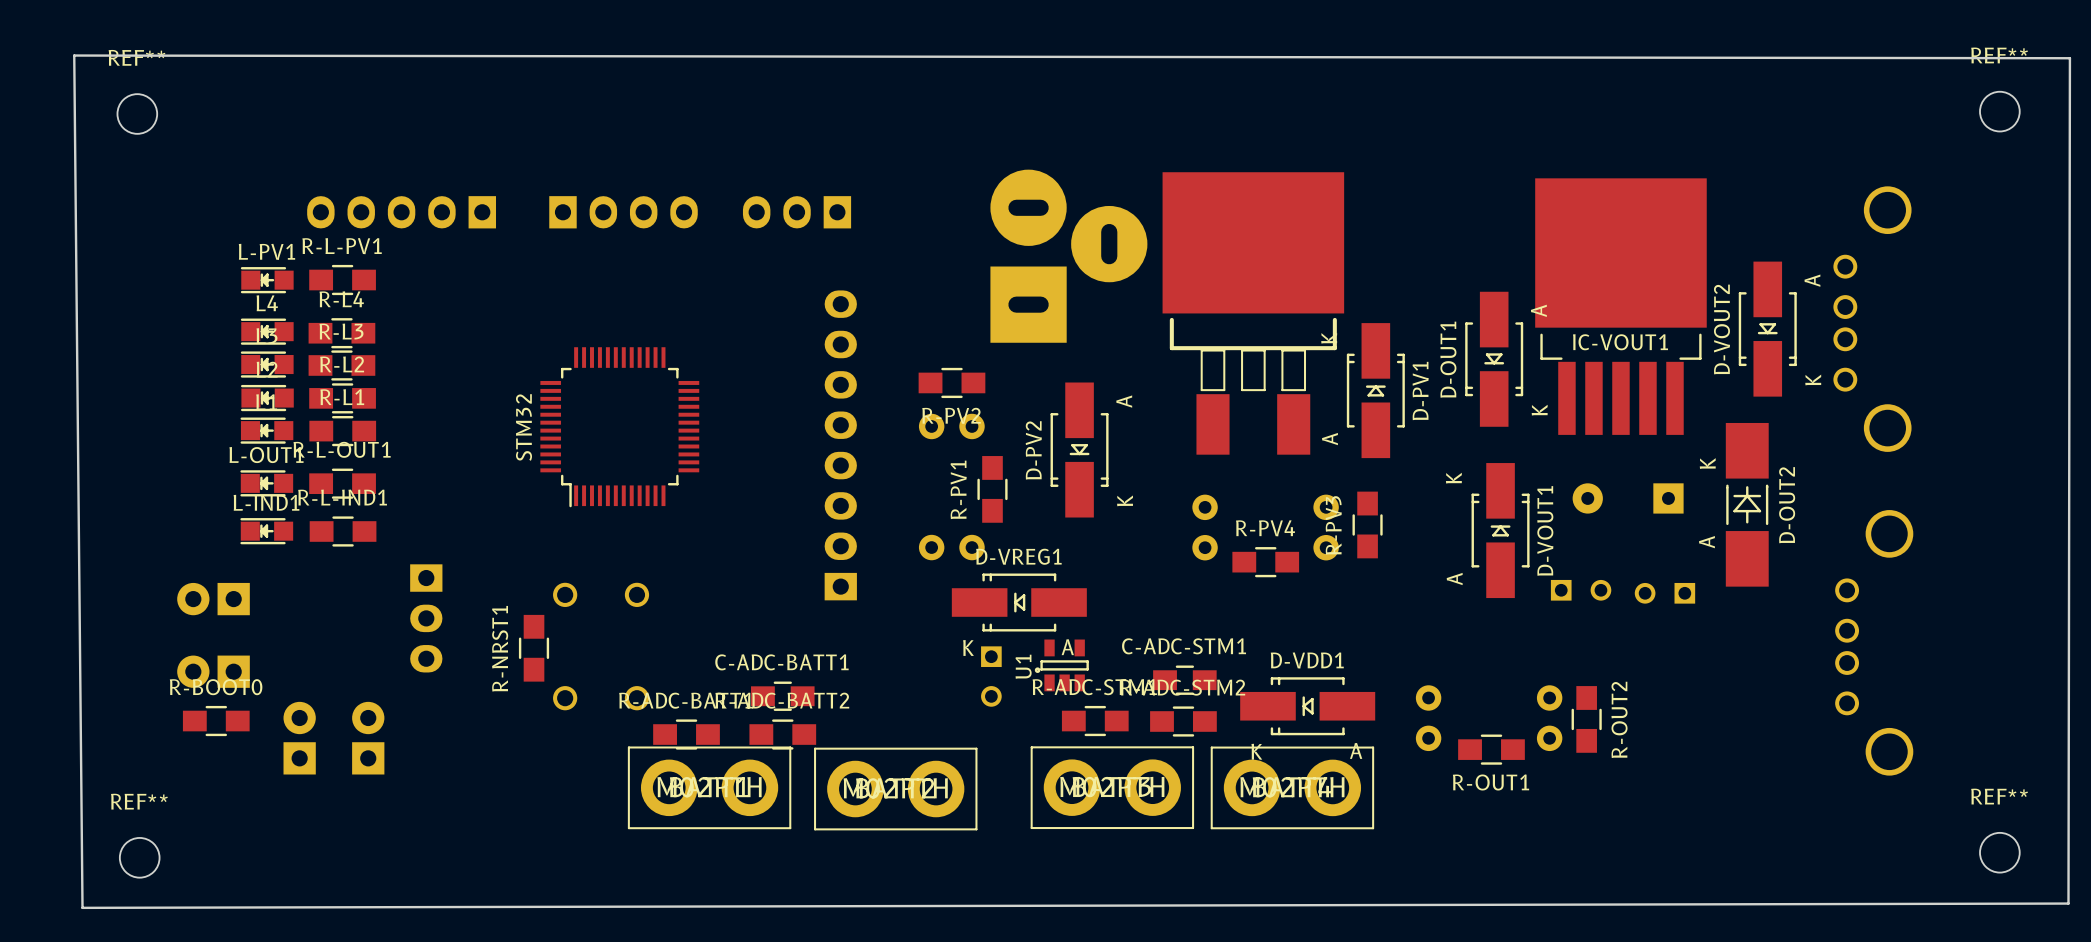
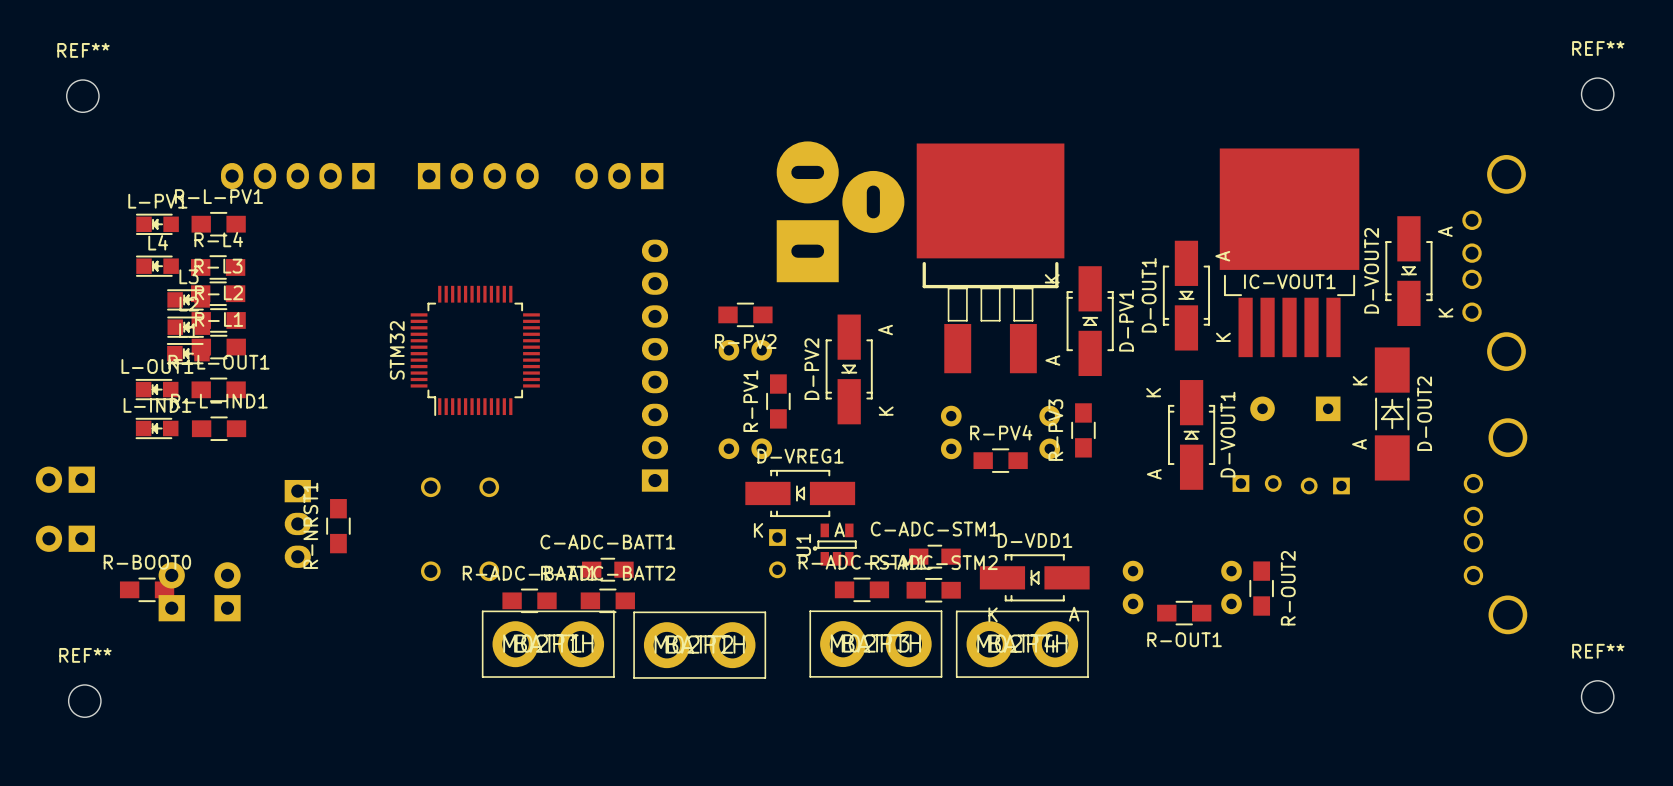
board edge: (74, 55) (82, 907) (2068, 903) (2069, 58) (74, 55) -> none
L-PV1 position: (267, 280) -> (157, 224)
R-L-PV1 position: (342, 280) -> (218, 224)
L4 position: (267, 331) -> (157, 266)
R-L4 position: (341, 333) -> (218, 267)
R-L3 position: (341, 365) -> (218, 293)
R-L2 position: (342, 398) -> (218, 320)
R-L1 position: (342, 431) -> (218, 347)
L-OUT1 position: (266, 483) -> (157, 389)
R-L-OUT1 position: (342, 483) -> (218, 389)
L-IND1 position: (266, 531) -> (157, 428)
R-L-IND1 position: (343, 531) -> (219, 428)
part: none -> (65, 479)
part: (213, 599) -> none
part position: (426, 618) -> (297, 523)
R-NRST1 position: (534, 648) -> (338, 526)
part: none -> (65, 538)
part: (213, 671) -> none
part: none -> (171, 591)
part position: (299, 738) -> (227, 591)
part: (368, 738) -> none

